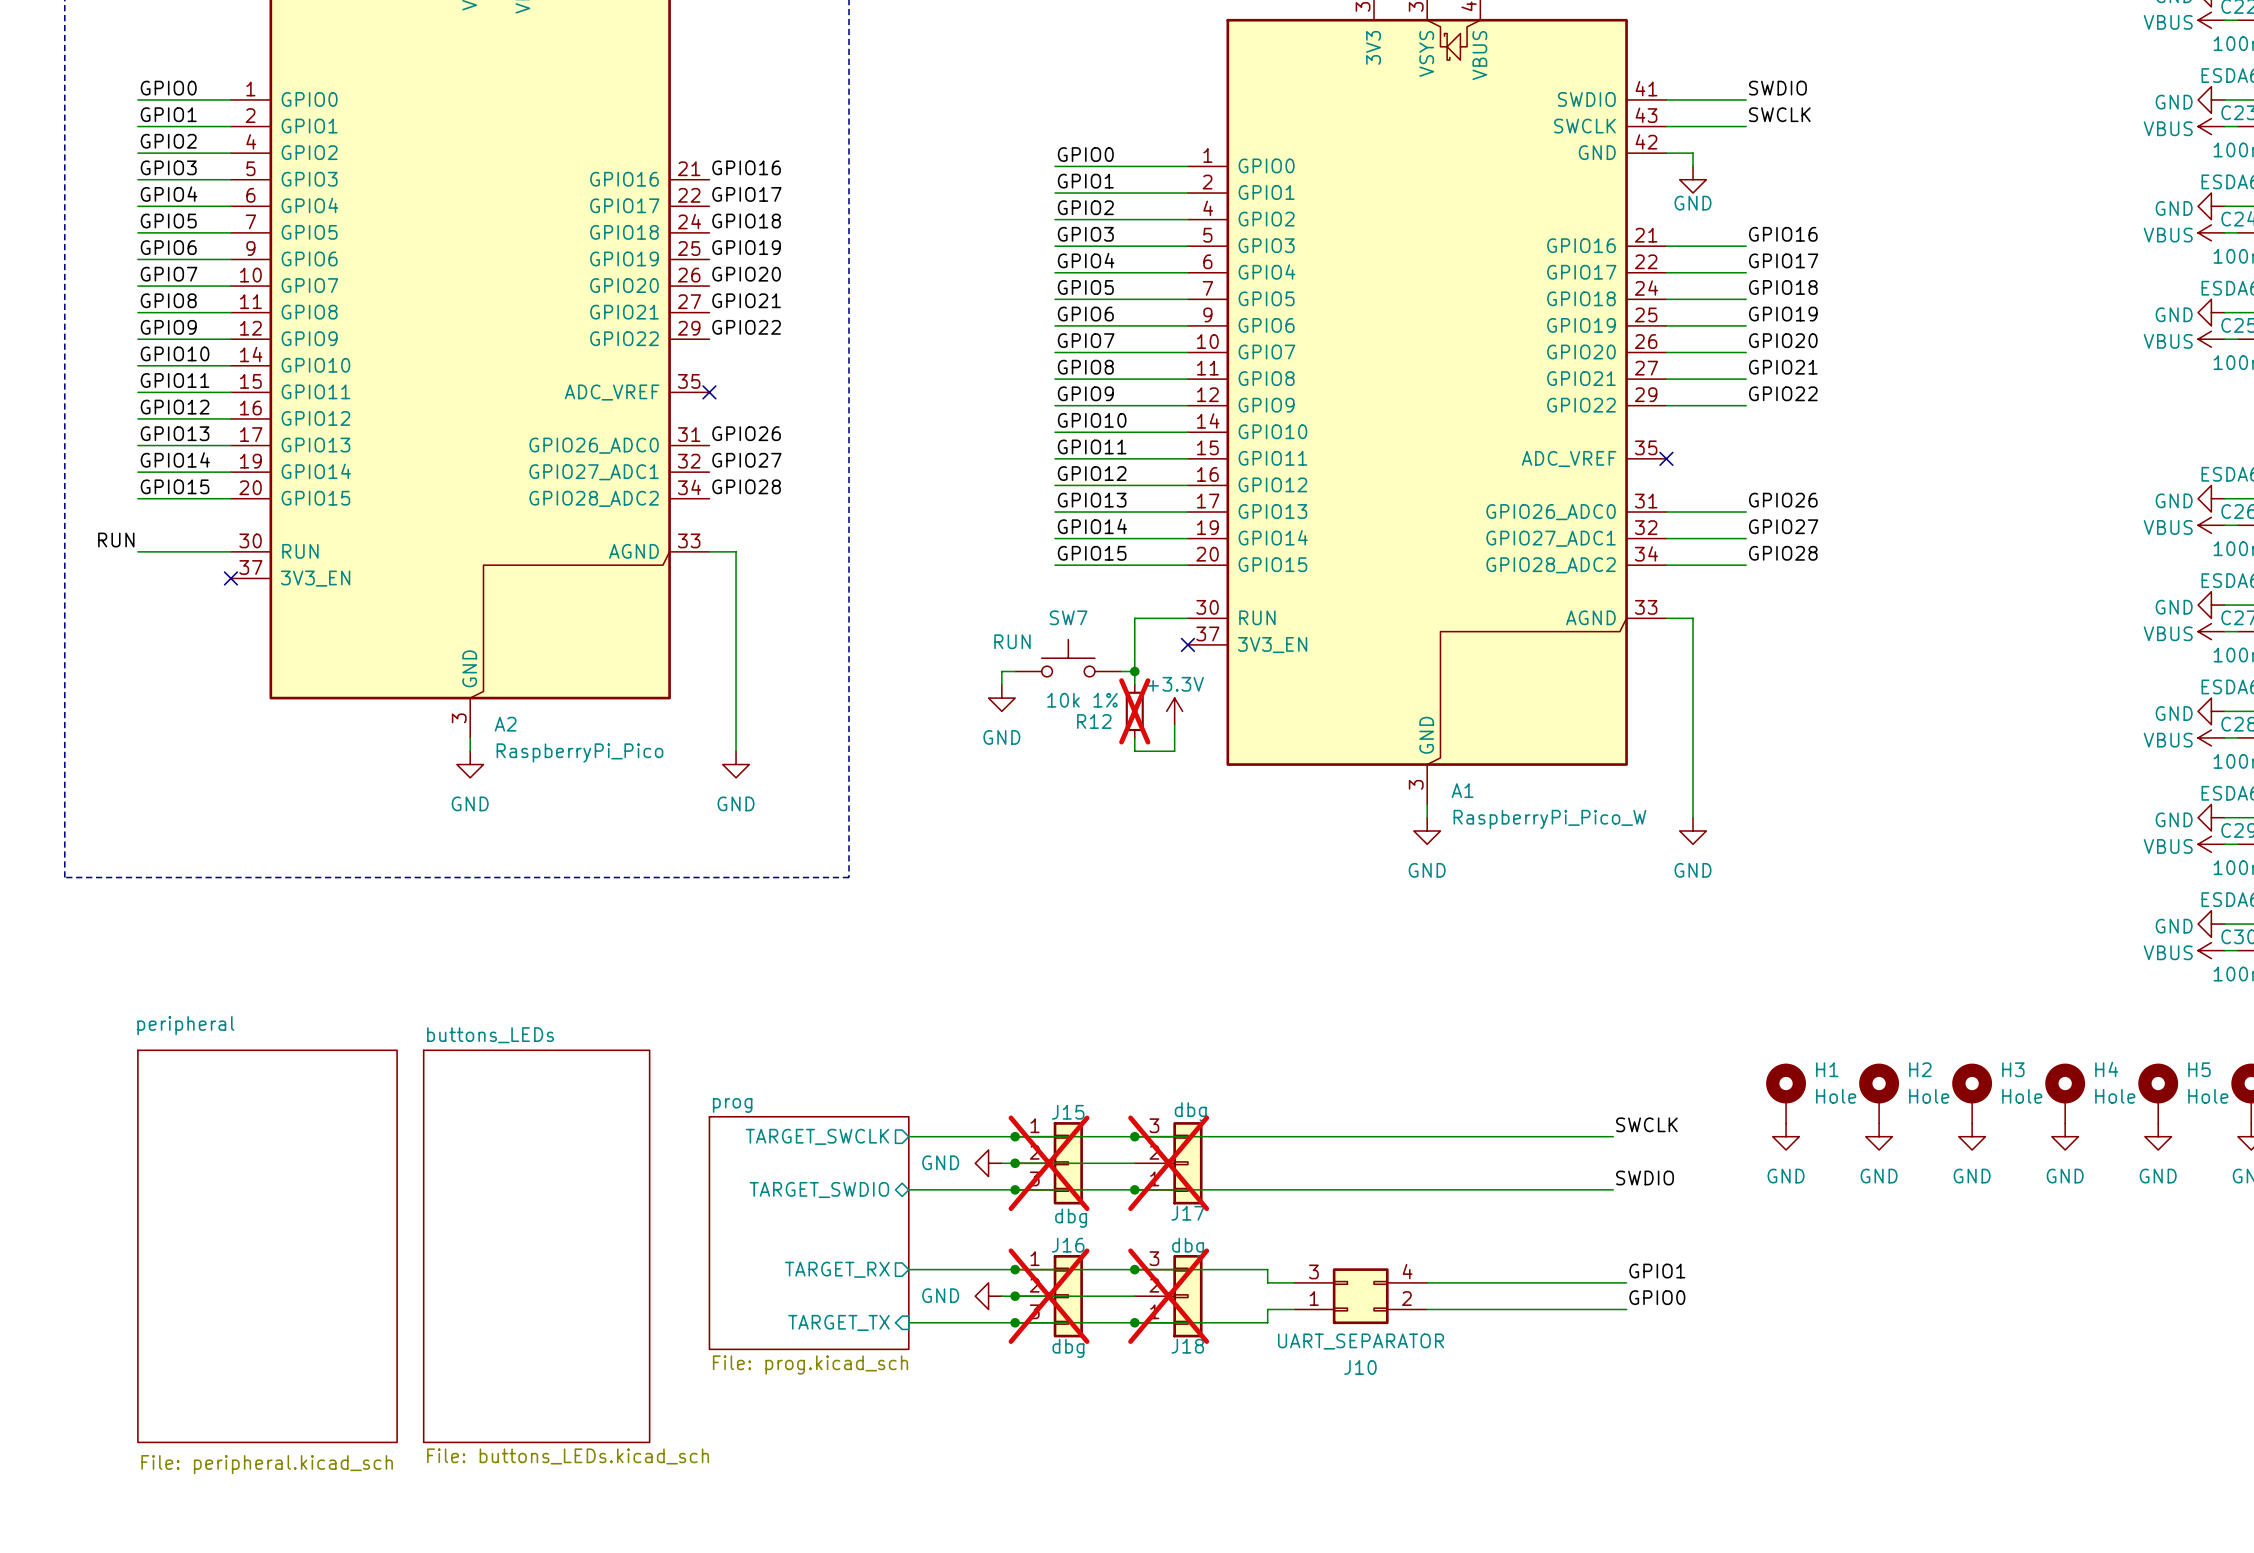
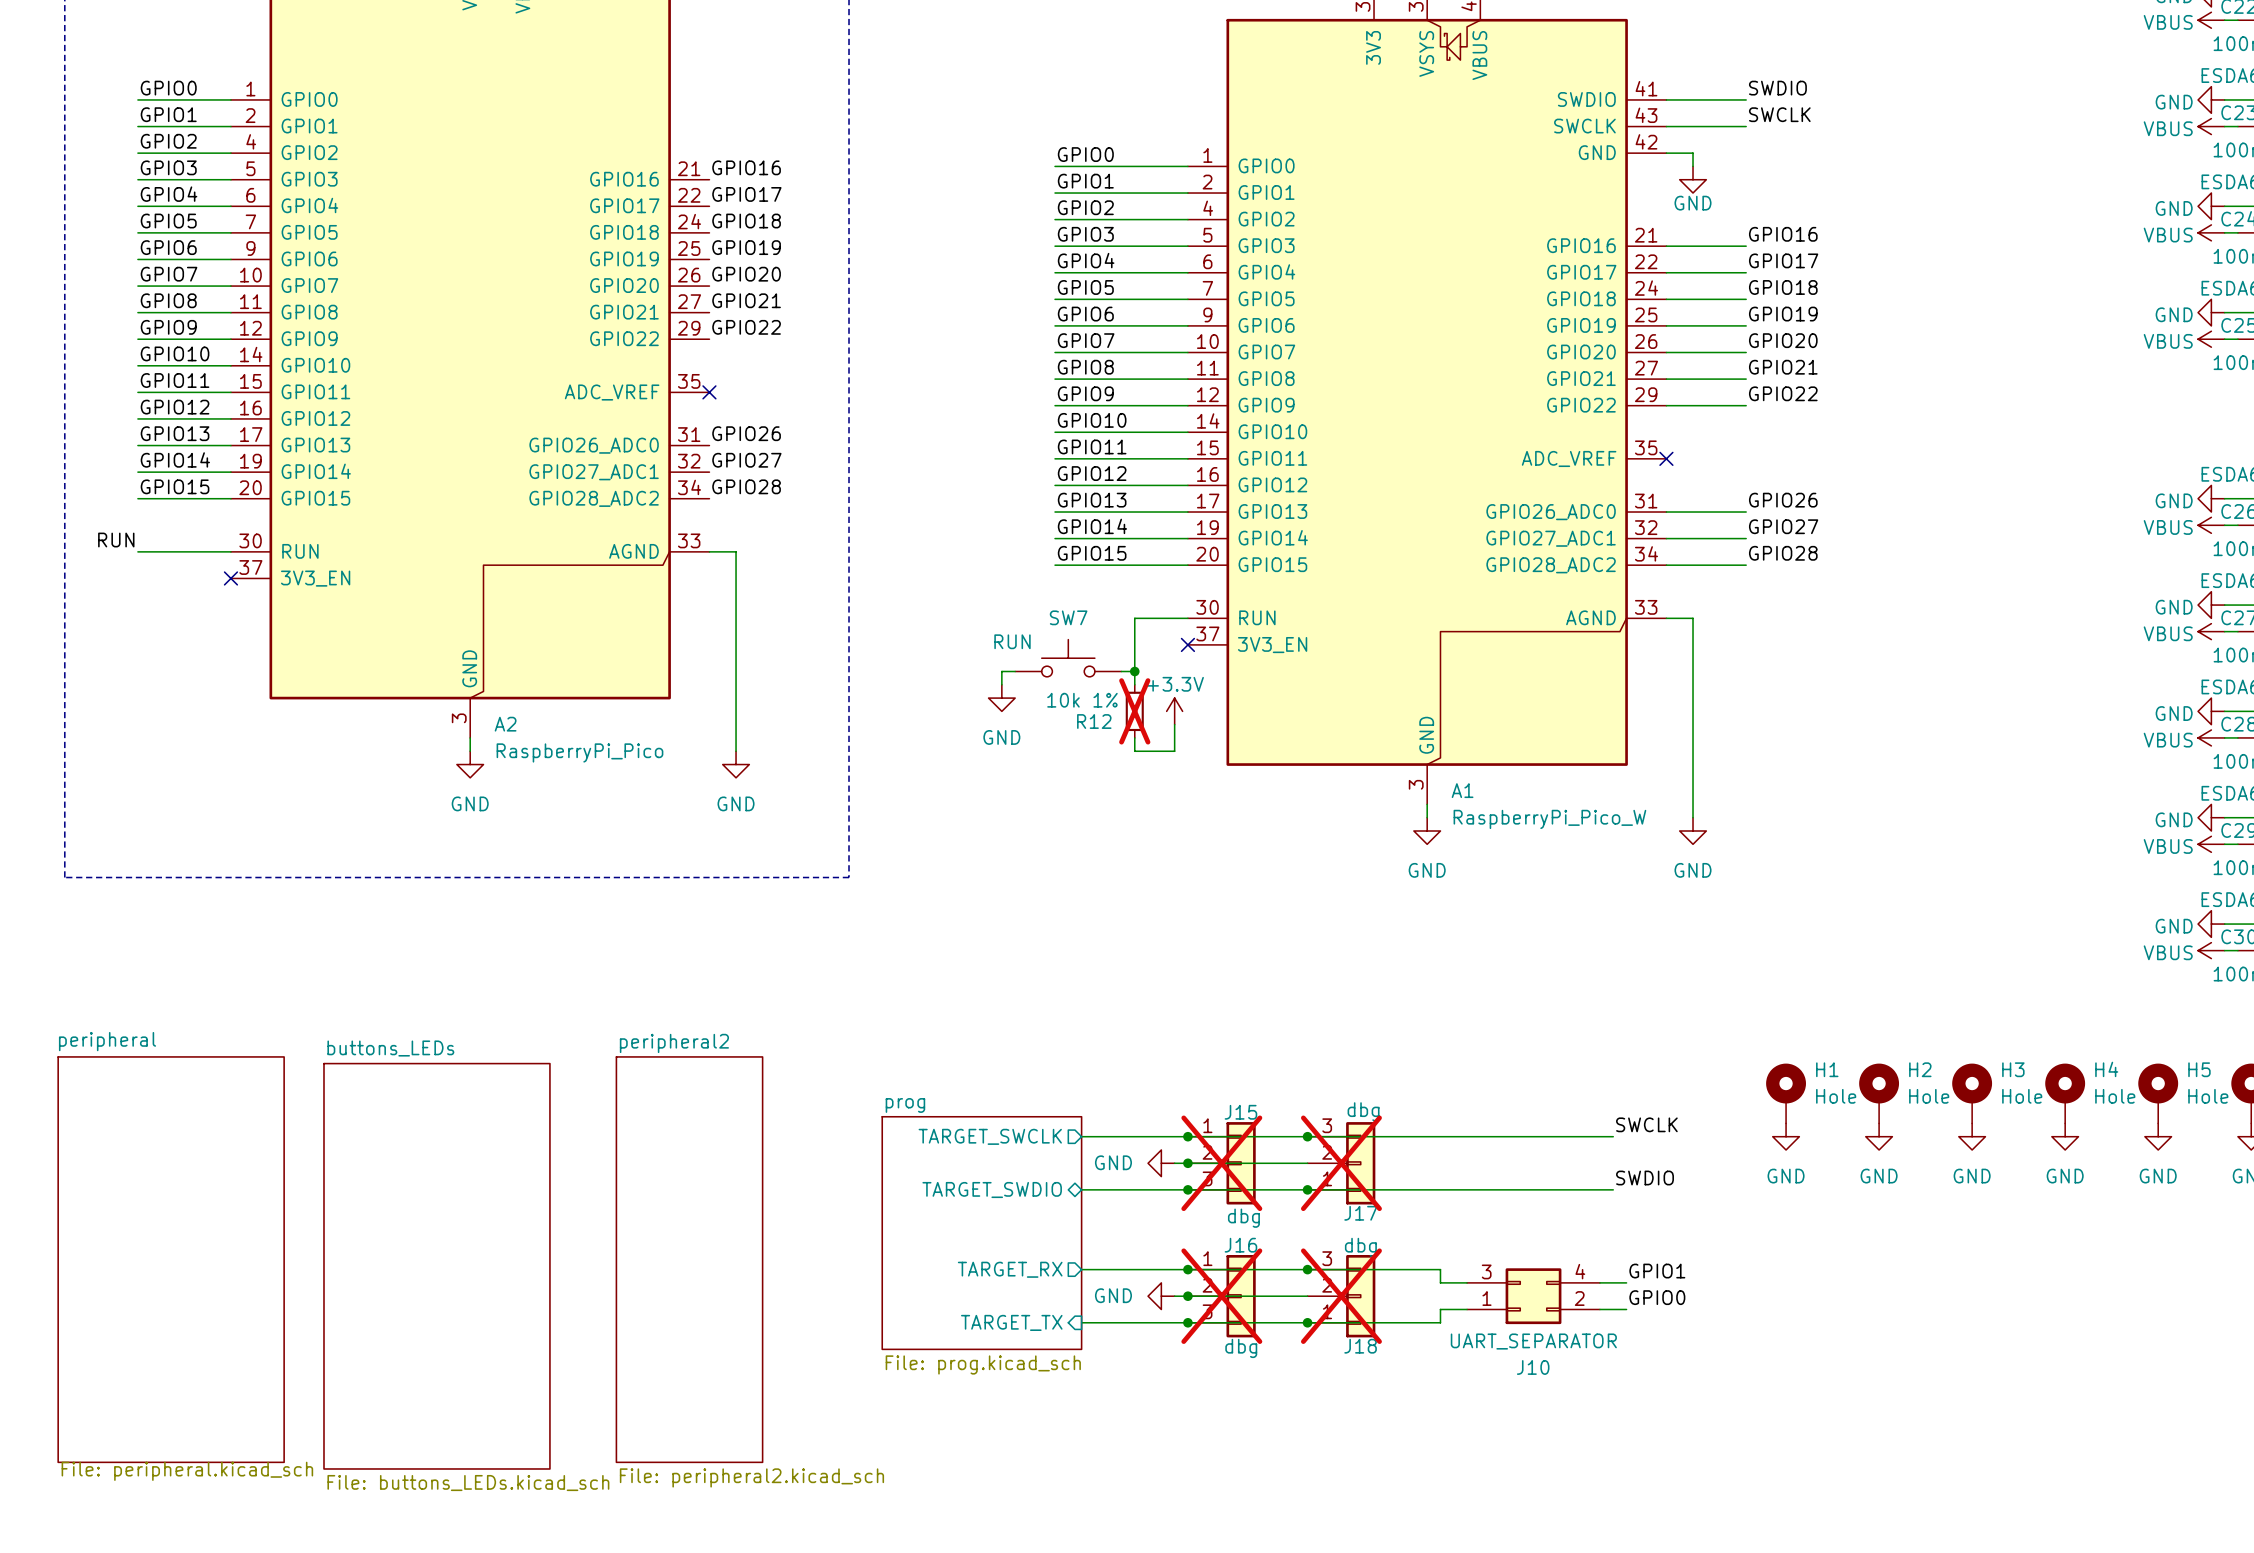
sheet pin position: TARGET_SWCLK (817, 1136) -> TARGET_SWCLK (990, 1136)
wire: (908, 1136) (1081, 1136) -> none
junction: (1015, 1136) -> none
junction: (1134, 1136) -> none
junction: none -> (1187, 1136)
junction: none -> (1307, 1136)
power symbol: GND (988, 1163) -> none
wire: (1001, 1163) (1134, 1163) -> (1174, 1163) (1307, 1163)
junction: (1015, 1163) -> none
J15 position: (1049, 1163) -> (1221, 1163)
power symbol: none -> GND (1161, 1163)
J17 position: (1168, 1163) -> (1341, 1163)
junction: none -> (1187, 1163)
wire: (908, 1189) (1081, 1189) -> none
junction: (1015, 1189) -> none
junction: (1134, 1189) -> none
junction: none -> (1187, 1189)
junction: none -> (1307, 1189)
sheet pin position: TARGET_SWDIO (819, 1190) -> TARGET_SWDIO (992, 1190)
sheet prog position: (809, 1233) -> (981, 1233)
sheet peripheral: File: peripheral.kicad_sch (267, 1246) -> none
sheet buttons_LEDs: File: buttons_LEDs.kicad_sch (536, 1246) -> none
sheet peripheral: none -> File: peripheral.kicad_sch (171, 1259)
sheet peripheral2: none -> File: peripheral2.kicad_sch (689, 1259)
sheet buttons_LEDs: none -> File: buttons_LEDs.kicad_sch (436, 1266)
sheet pin position: TARGET_RX (837, 1269) -> TARGET_RX (1010, 1269)
wire: (908, 1269) (1081, 1269) -> none
junction: (1015, 1269) -> none
junction: (1134, 1269) -> none
junction: none -> (1187, 1269)
wire: (1267, 1269) (1267, 1282) (1294, 1282) -> (1267, 1269) (1440, 1269) (1440, 1282)
junction: none -> (1307, 1269)
wire: (1427, 1282) (1440, 1282) -> none
power symbol: GND (988, 1296) -> none
wire: (1001, 1296) (1134, 1296) -> (1174, 1296) (1307, 1296)
junction: (1015, 1296) -> none
J16 position: (1049, 1296) -> (1221, 1296)
power symbol: none -> GND (1161, 1296)
J18 position: (1168, 1296) -> (1341, 1296)
junction: none -> (1187, 1296)
J10 position: (1360, 1296) -> (1533, 1296)
wire: (1294, 1309) (1267, 1309) (1267, 1322) -> (1440, 1309) (1440, 1322) (1267, 1322)
wire: (1427, 1309) (1440, 1309) -> none
sheet pin position: TARGET_TX (838, 1322) -> TARGET_TX (1011, 1322)
wire: (908, 1322) (1081, 1322) -> none
junction: (1015, 1322) -> none
junction: (1134, 1322) -> none
junction: none -> (1187, 1322)
junction: none -> (1307, 1322)

